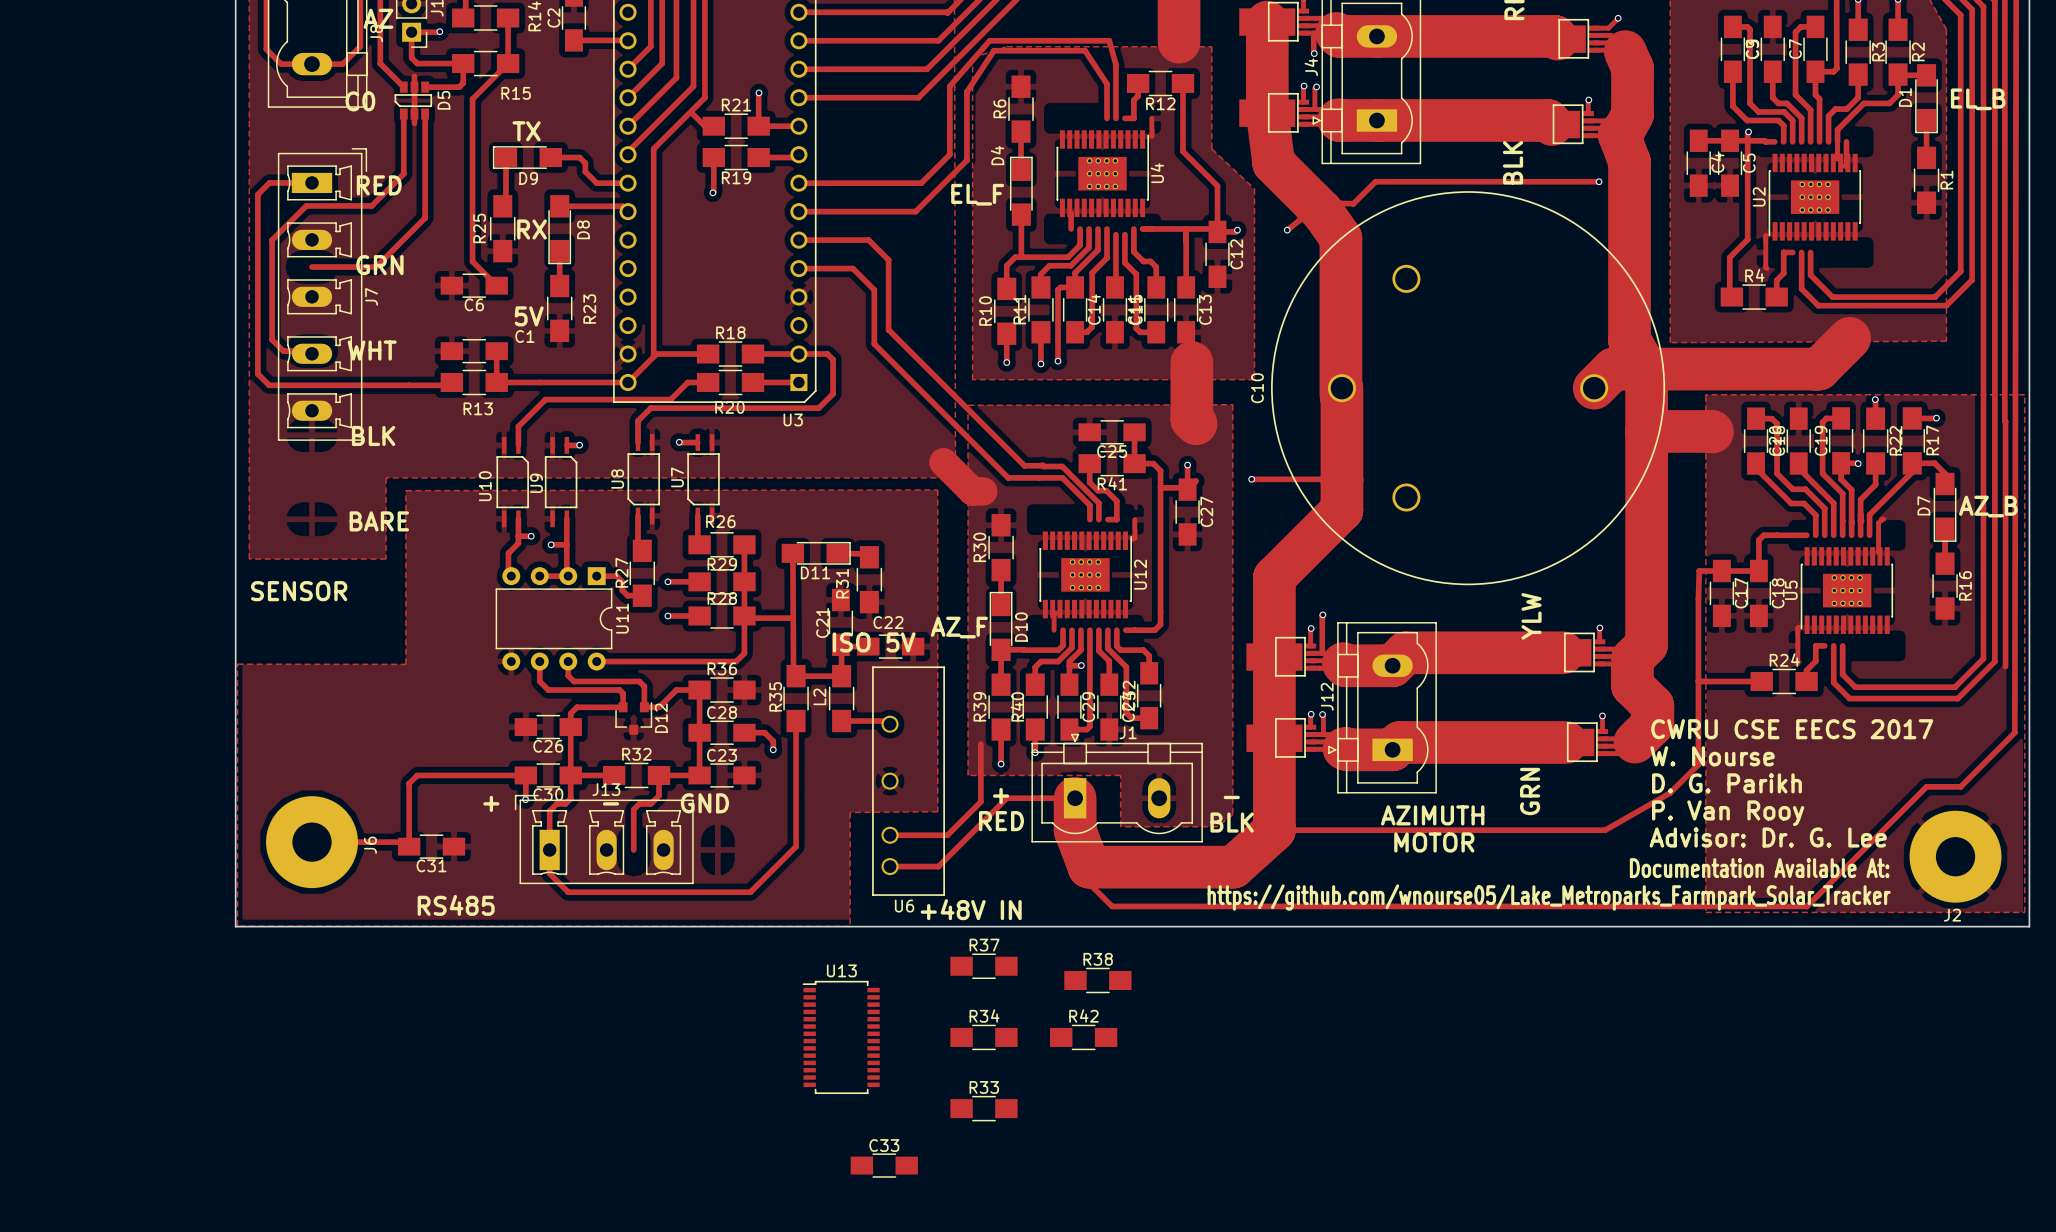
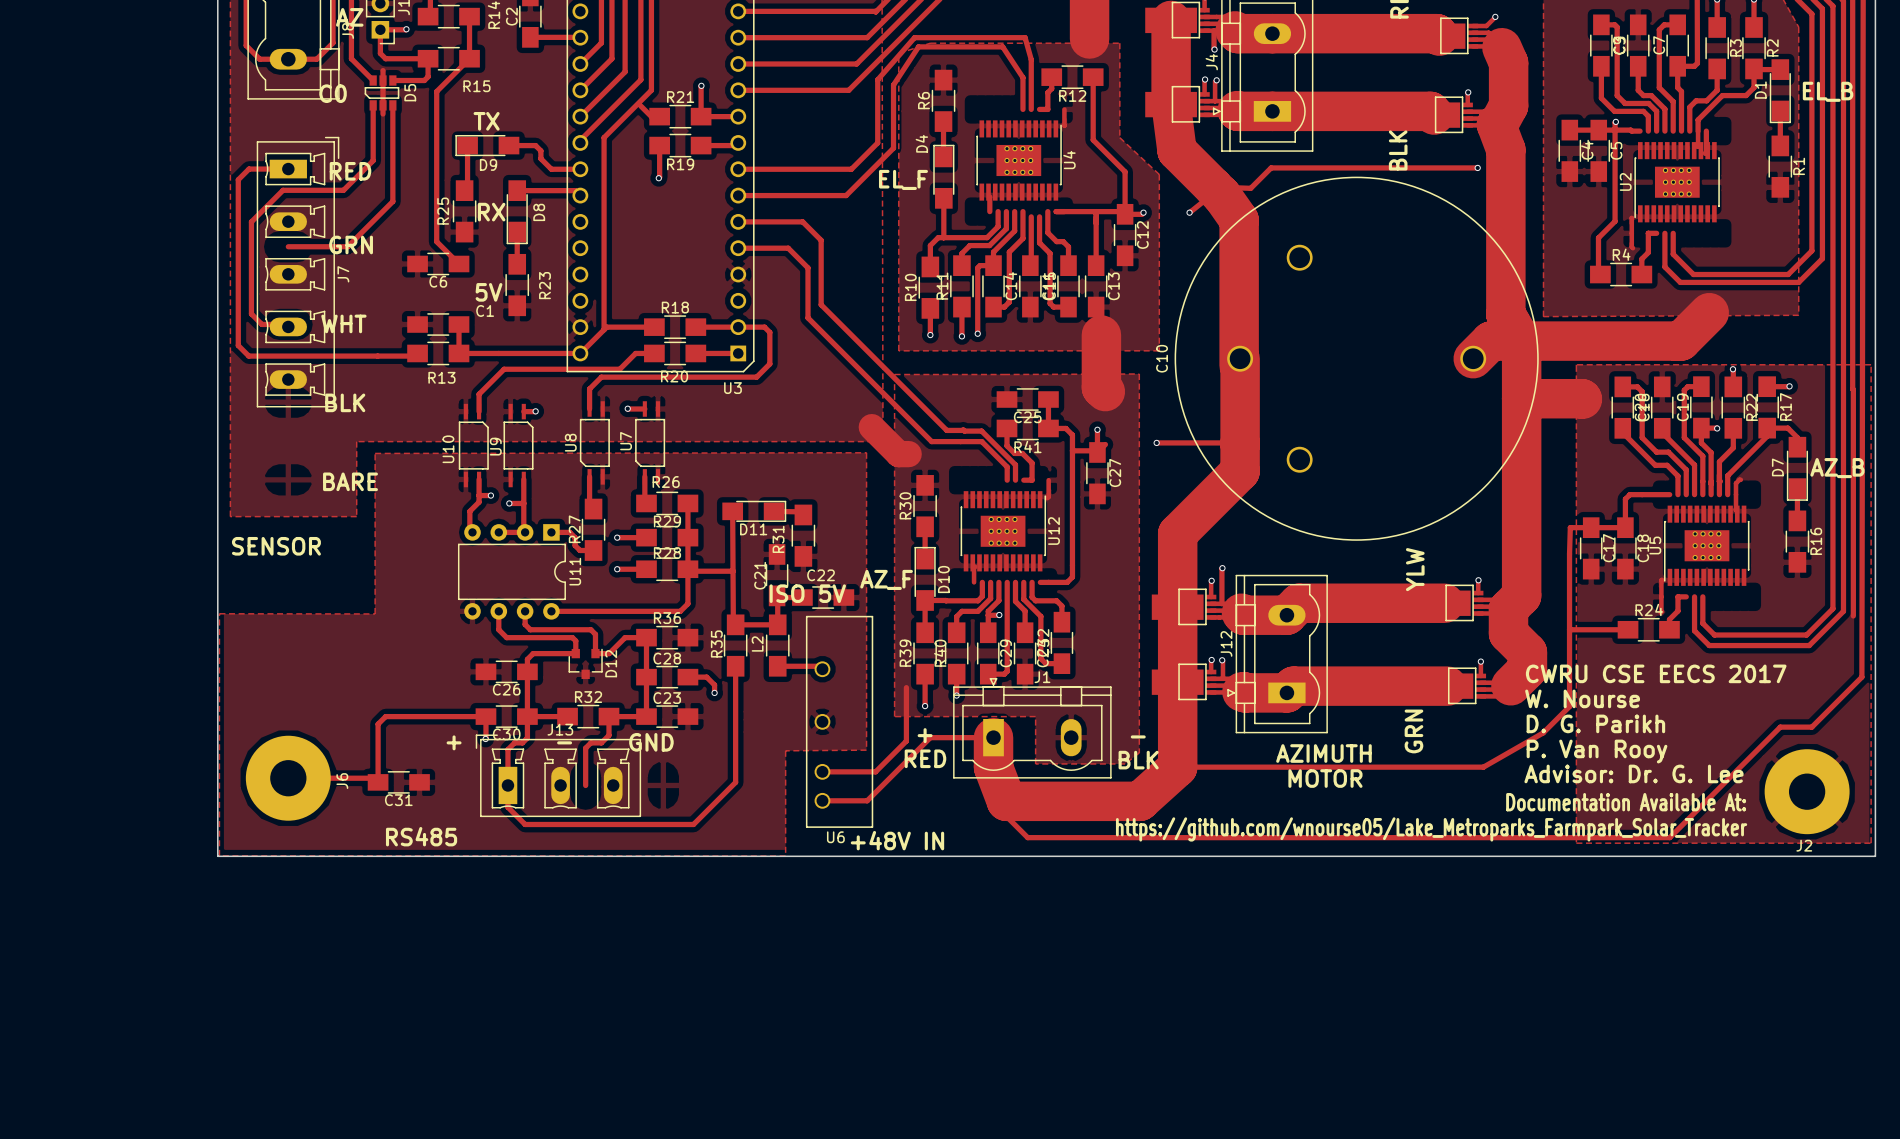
R37: (983, 966) -> none
R38: (1097, 980) -> none
U13: (841, 1037) -> none
R34: (983, 1037) -> none
R42: (1083, 1037) -> none
R33: (983, 1108) -> none
C33: (884, 1165) -> none

